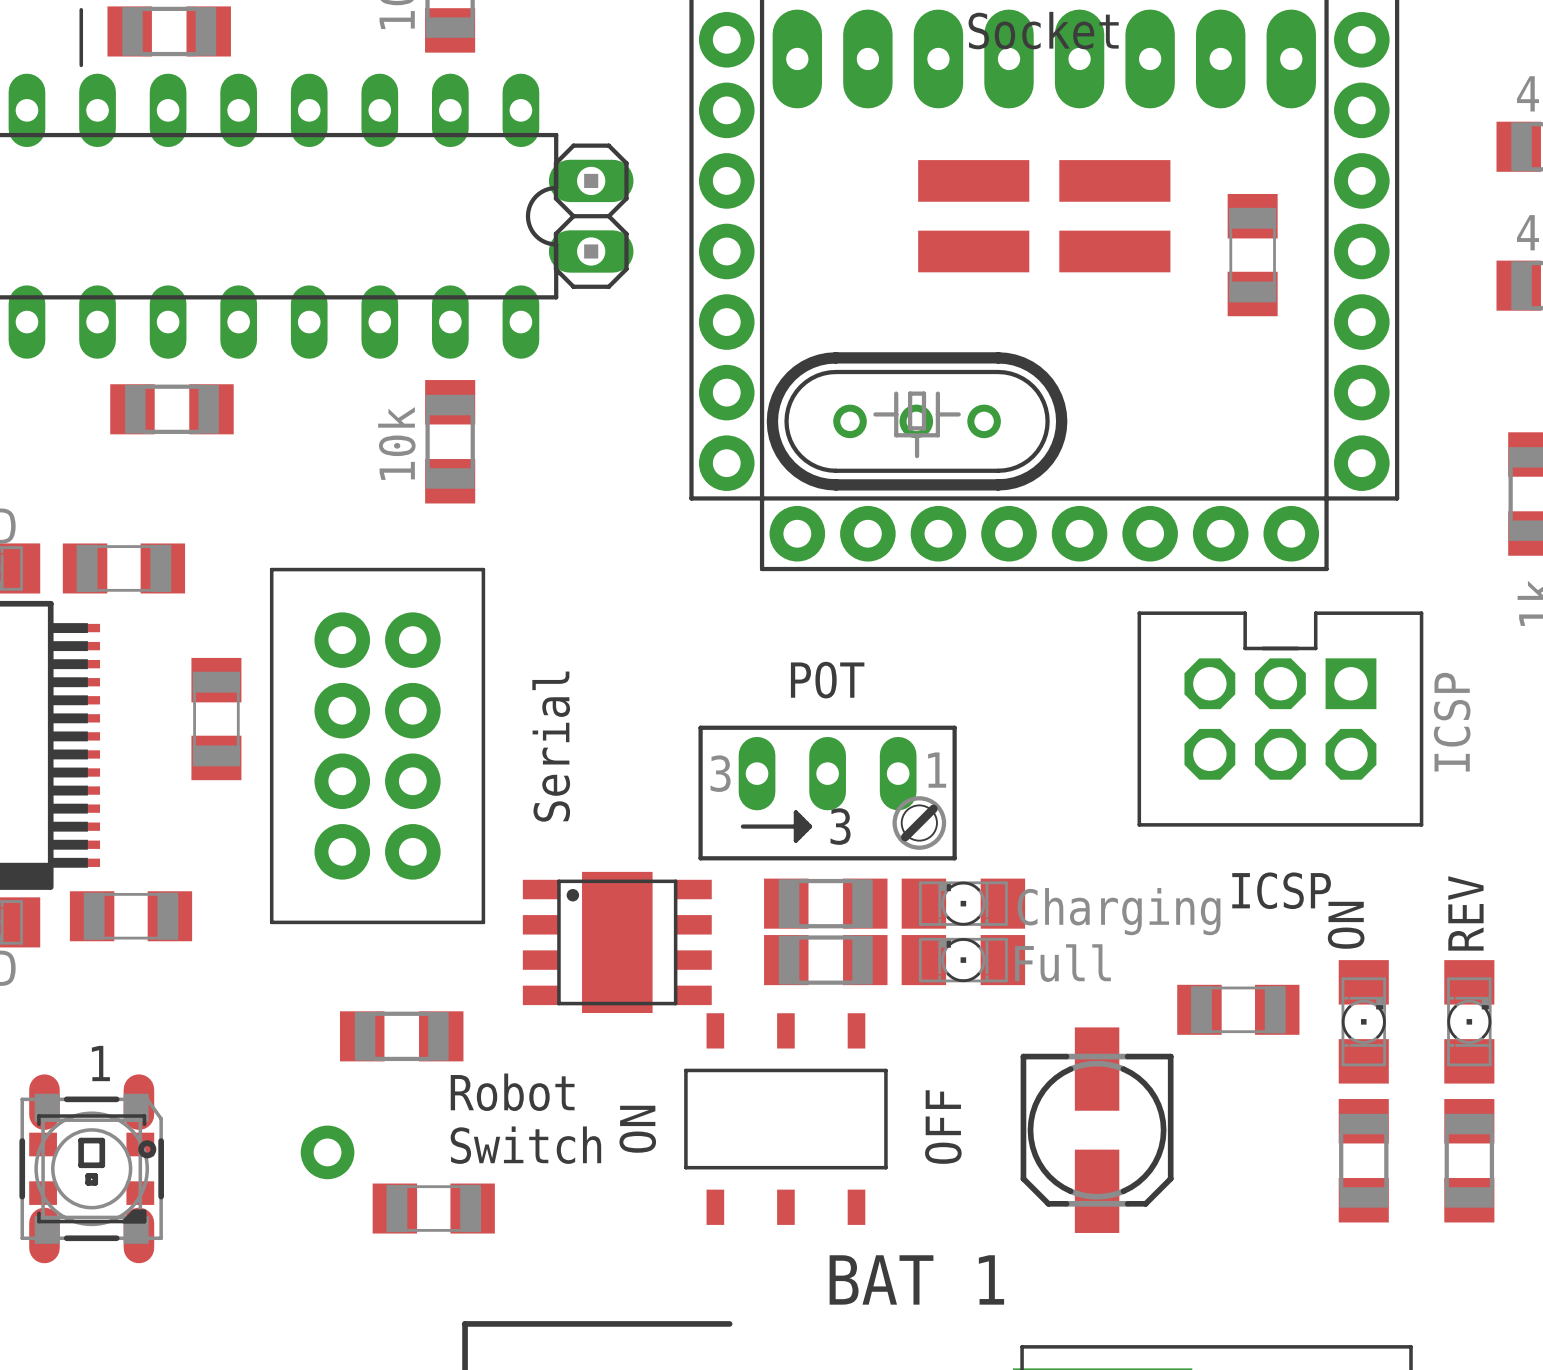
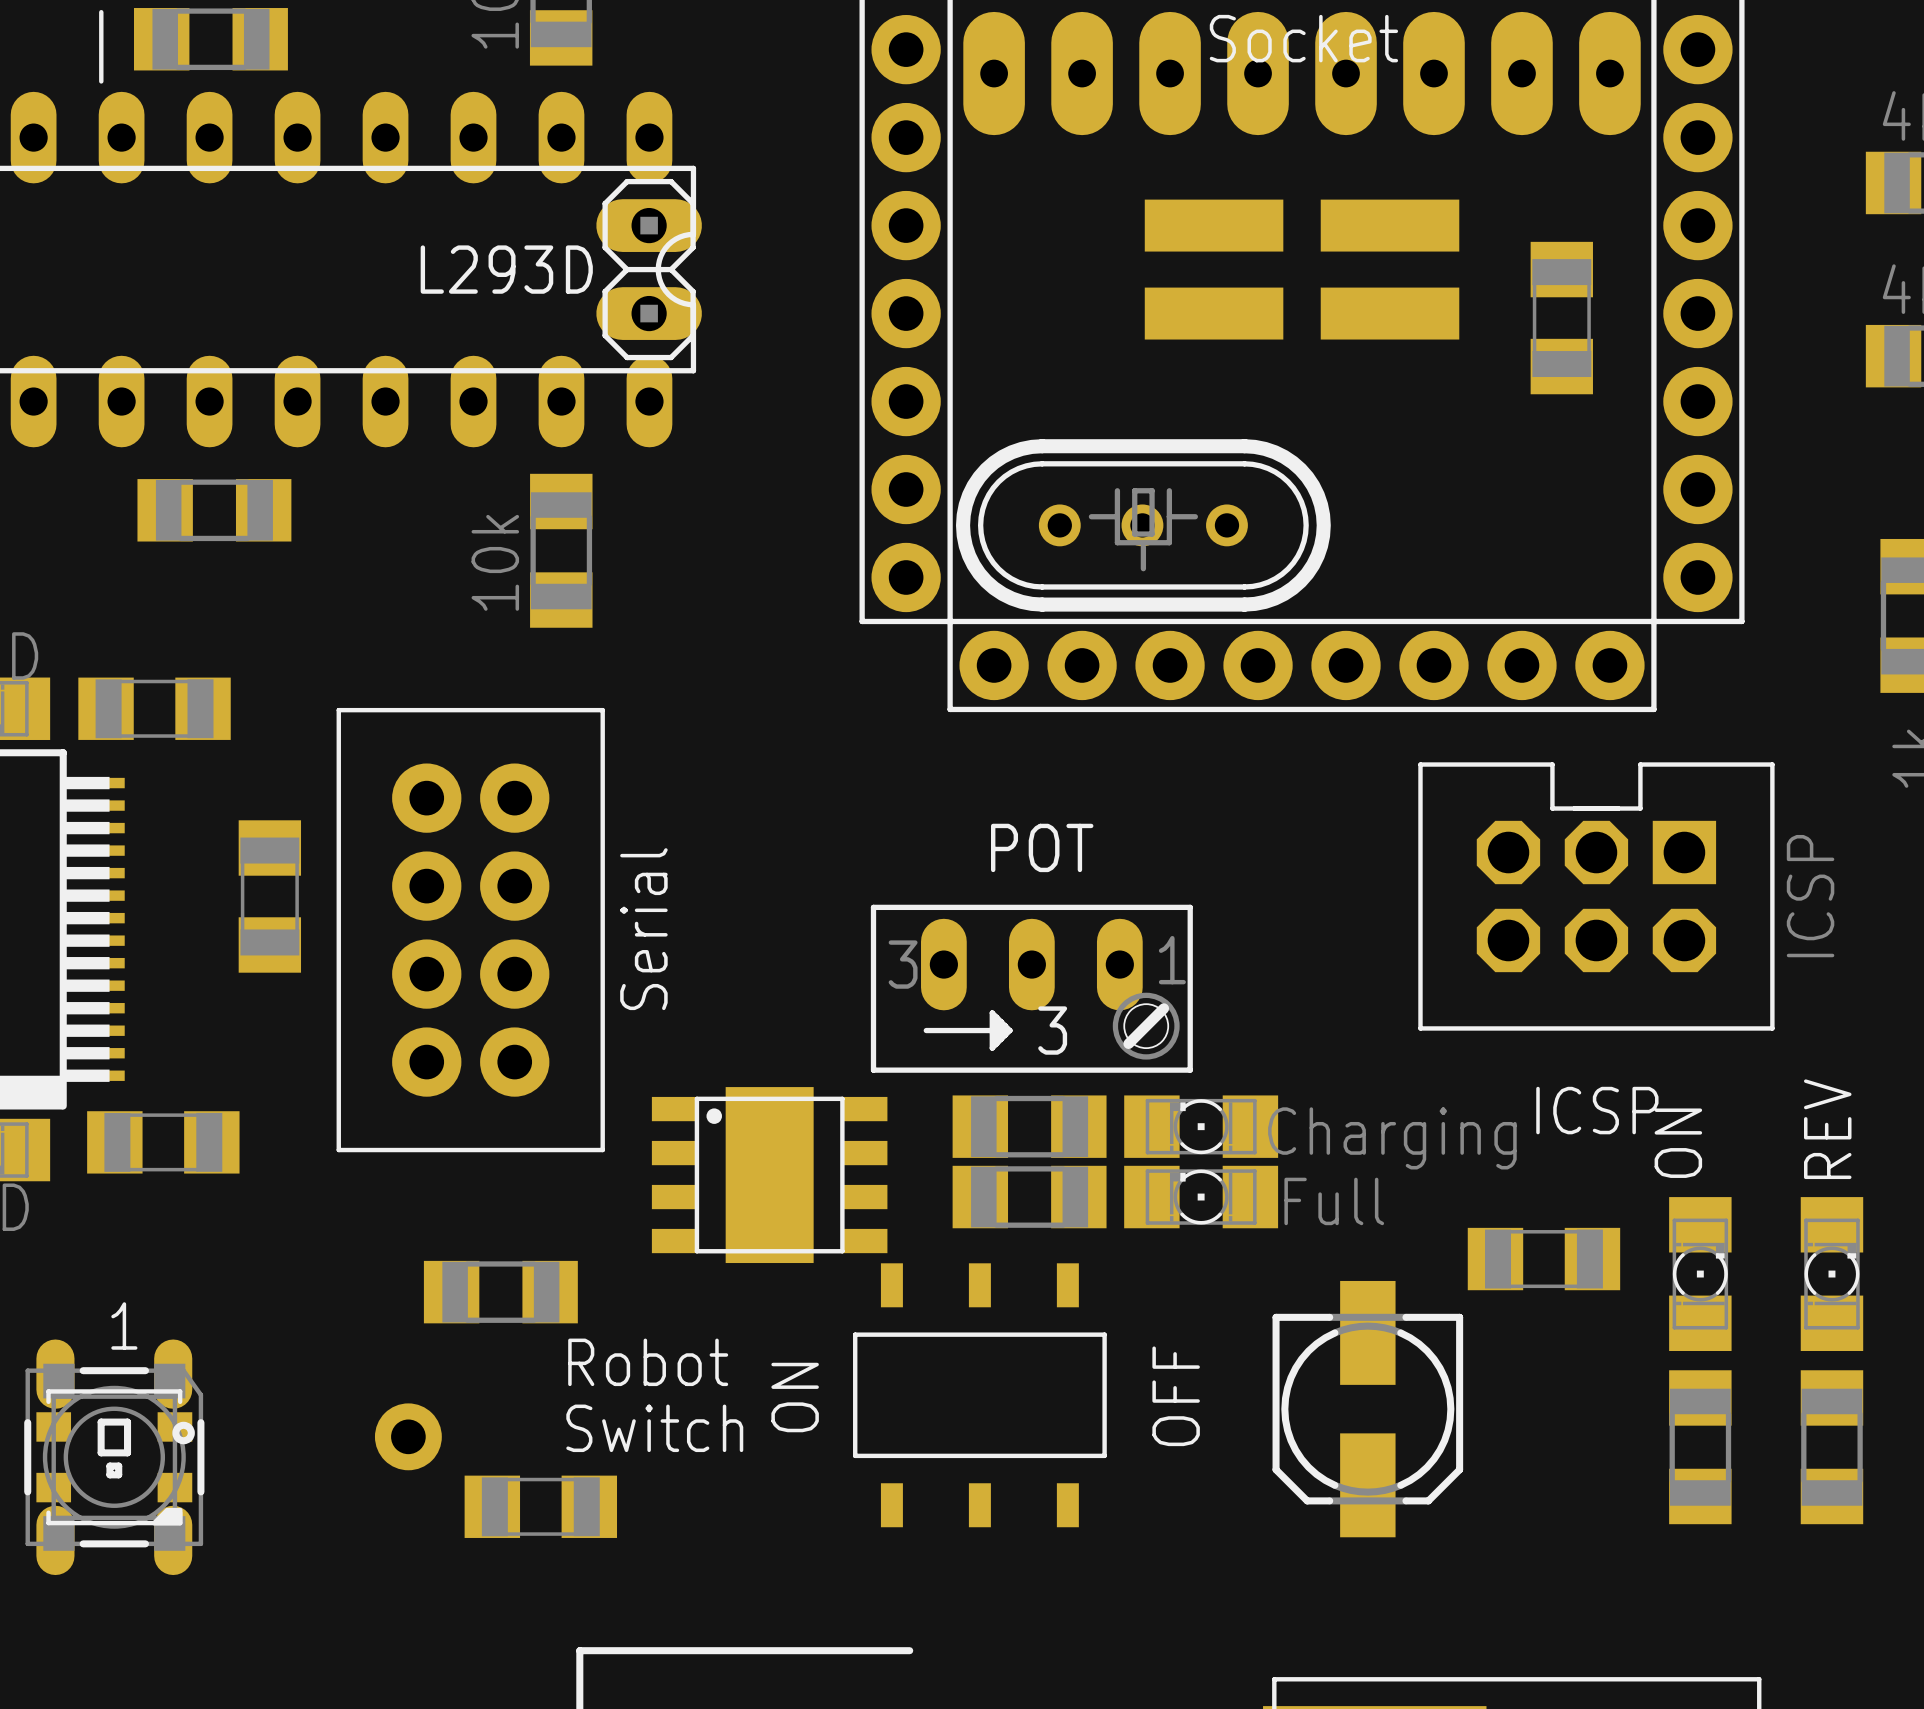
part value: none -> L293D (506, 269)
part position: (591, 216) -> (649, 269)
part text position: Serial (551, 746) -> Serial (643, 929)
text: BAT 1 (916, 1279) -> none

